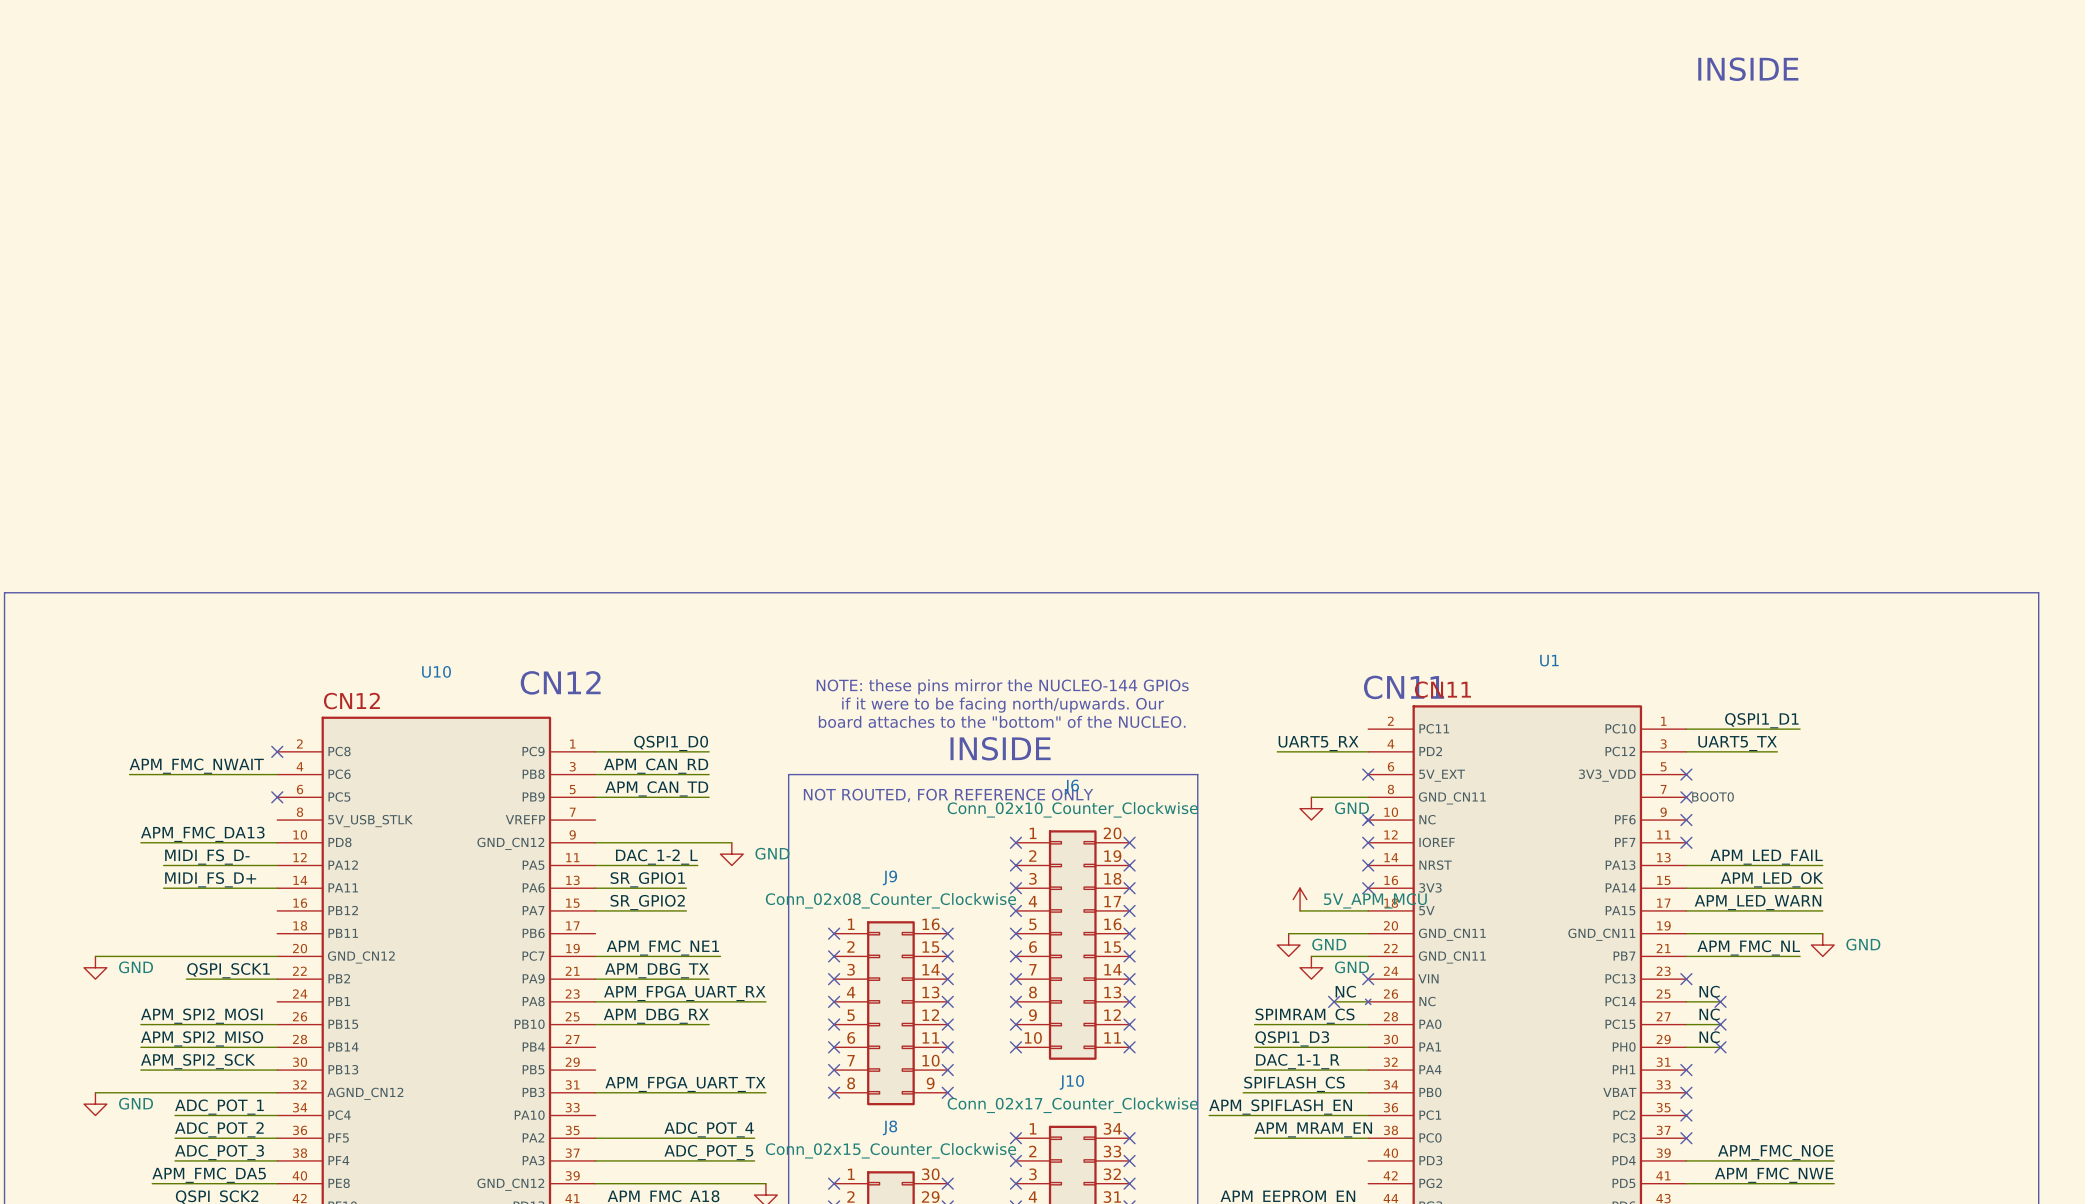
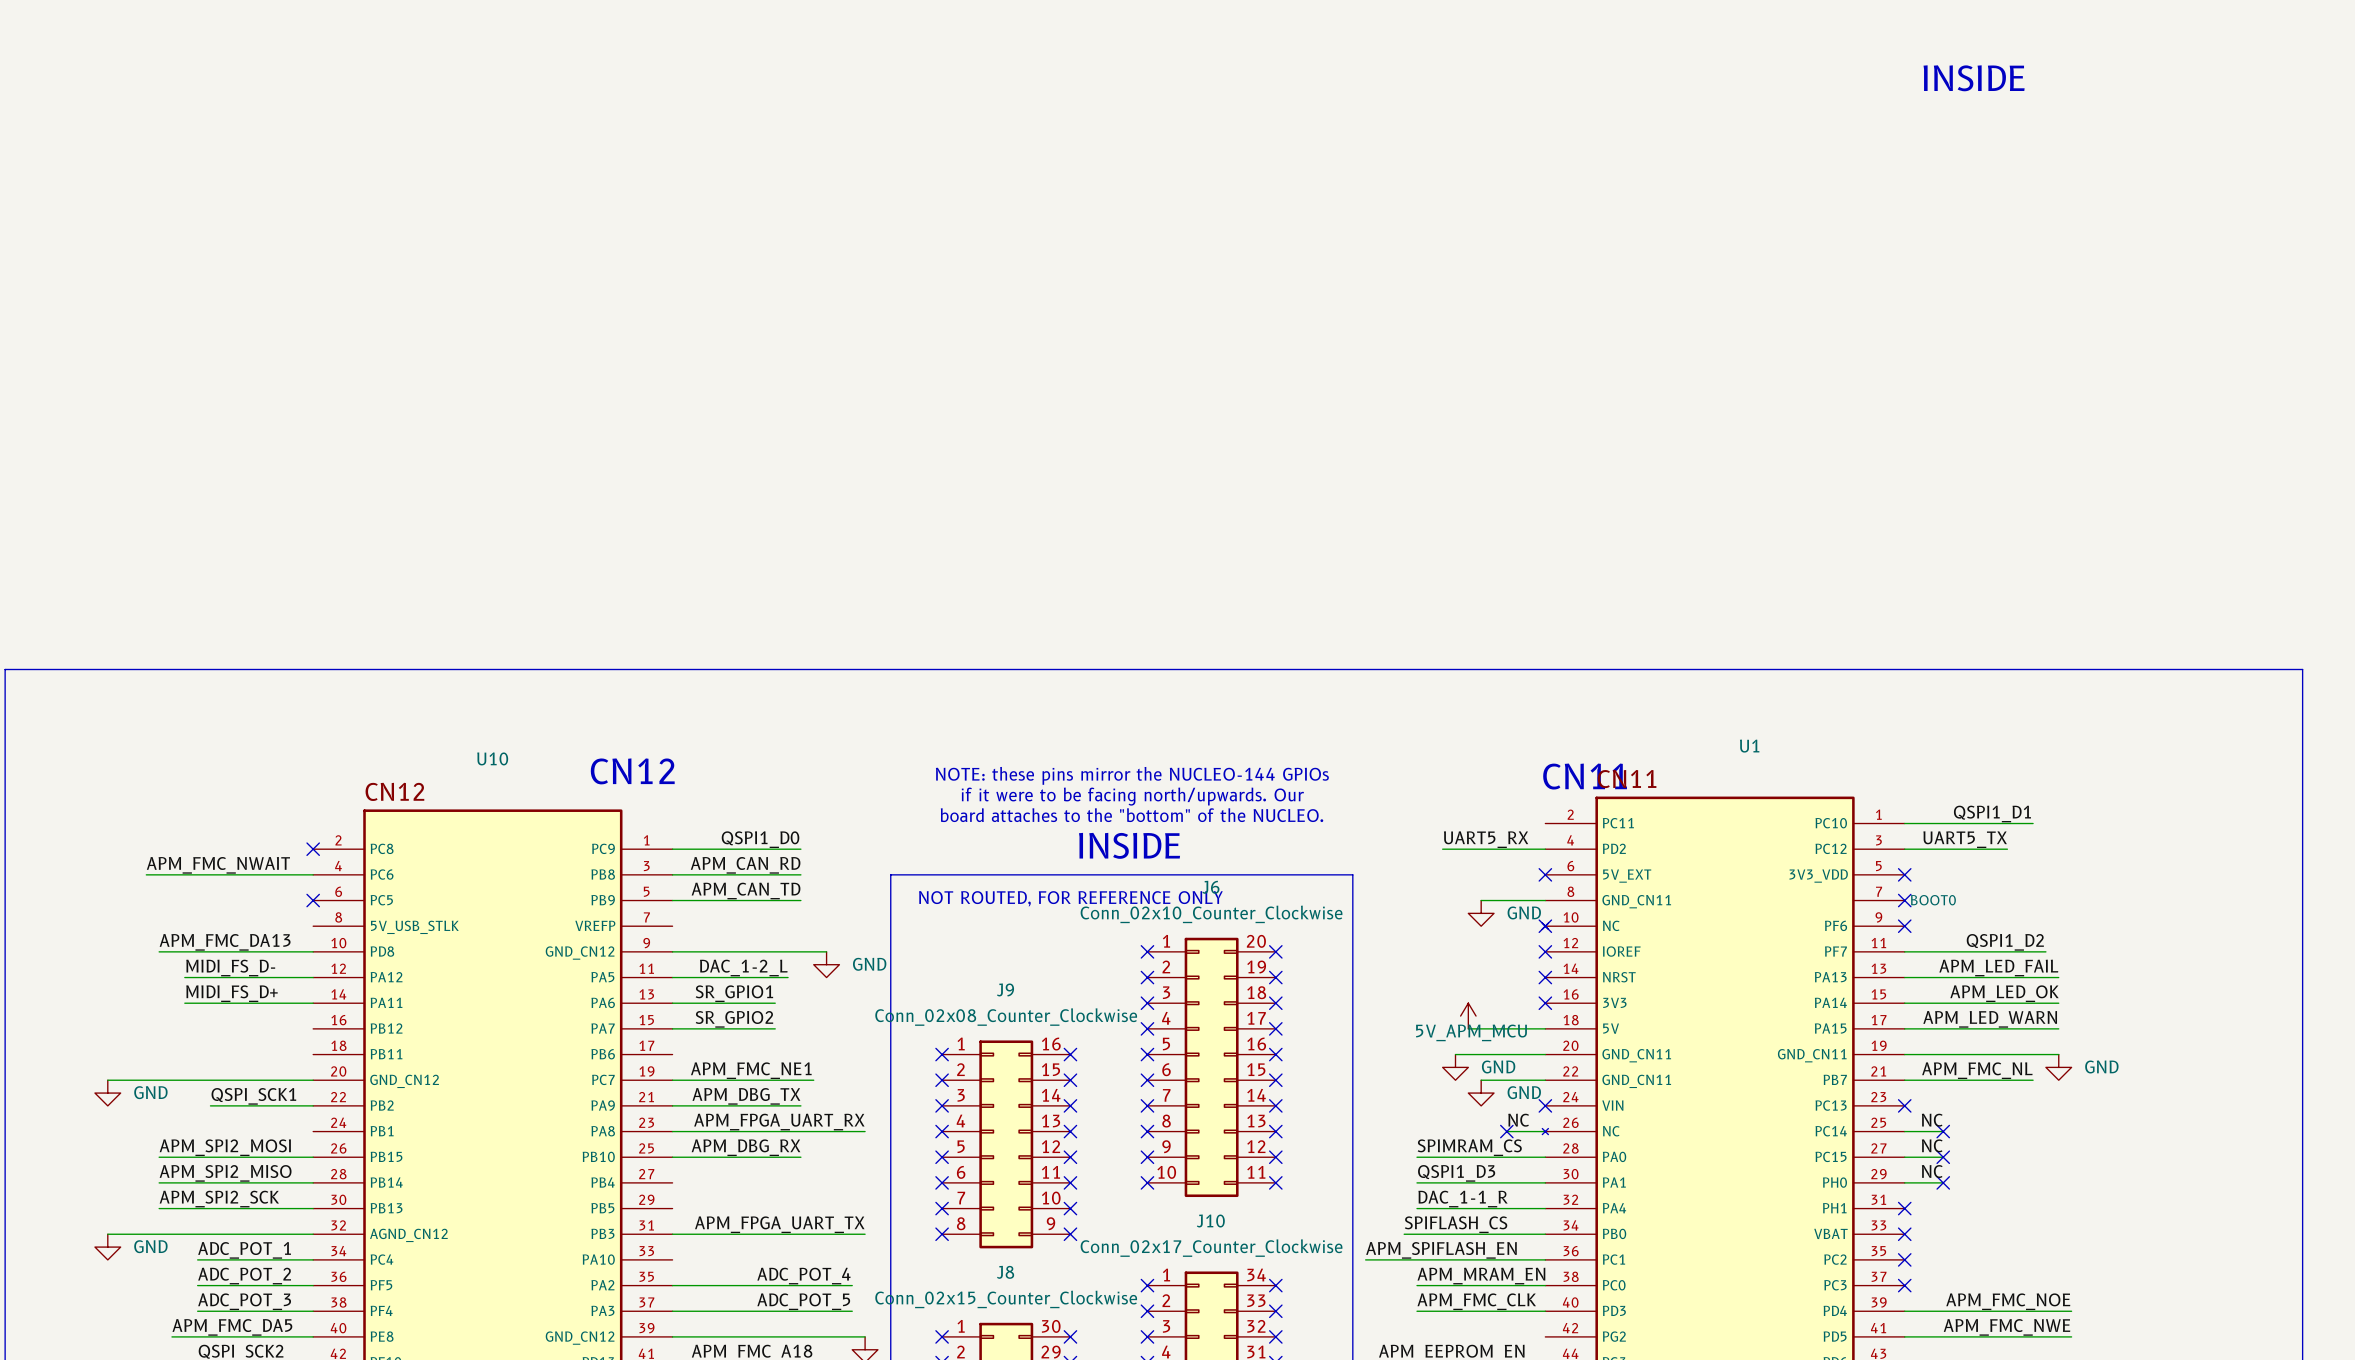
label: none -> QSPI1_D2 (2005, 942)
wire: none -> (1904, 951) (2045, 951)
no-connect mark: (1686, 842) -> none
power symbol text position: 5V_APM_MCU (1375, 900) -> 5V_APM_MCU (1471, 1032)
label: none -> APM_FMC_CLK (1476, 1301)
wire: none -> (1416, 1311) (1545, 1311)

